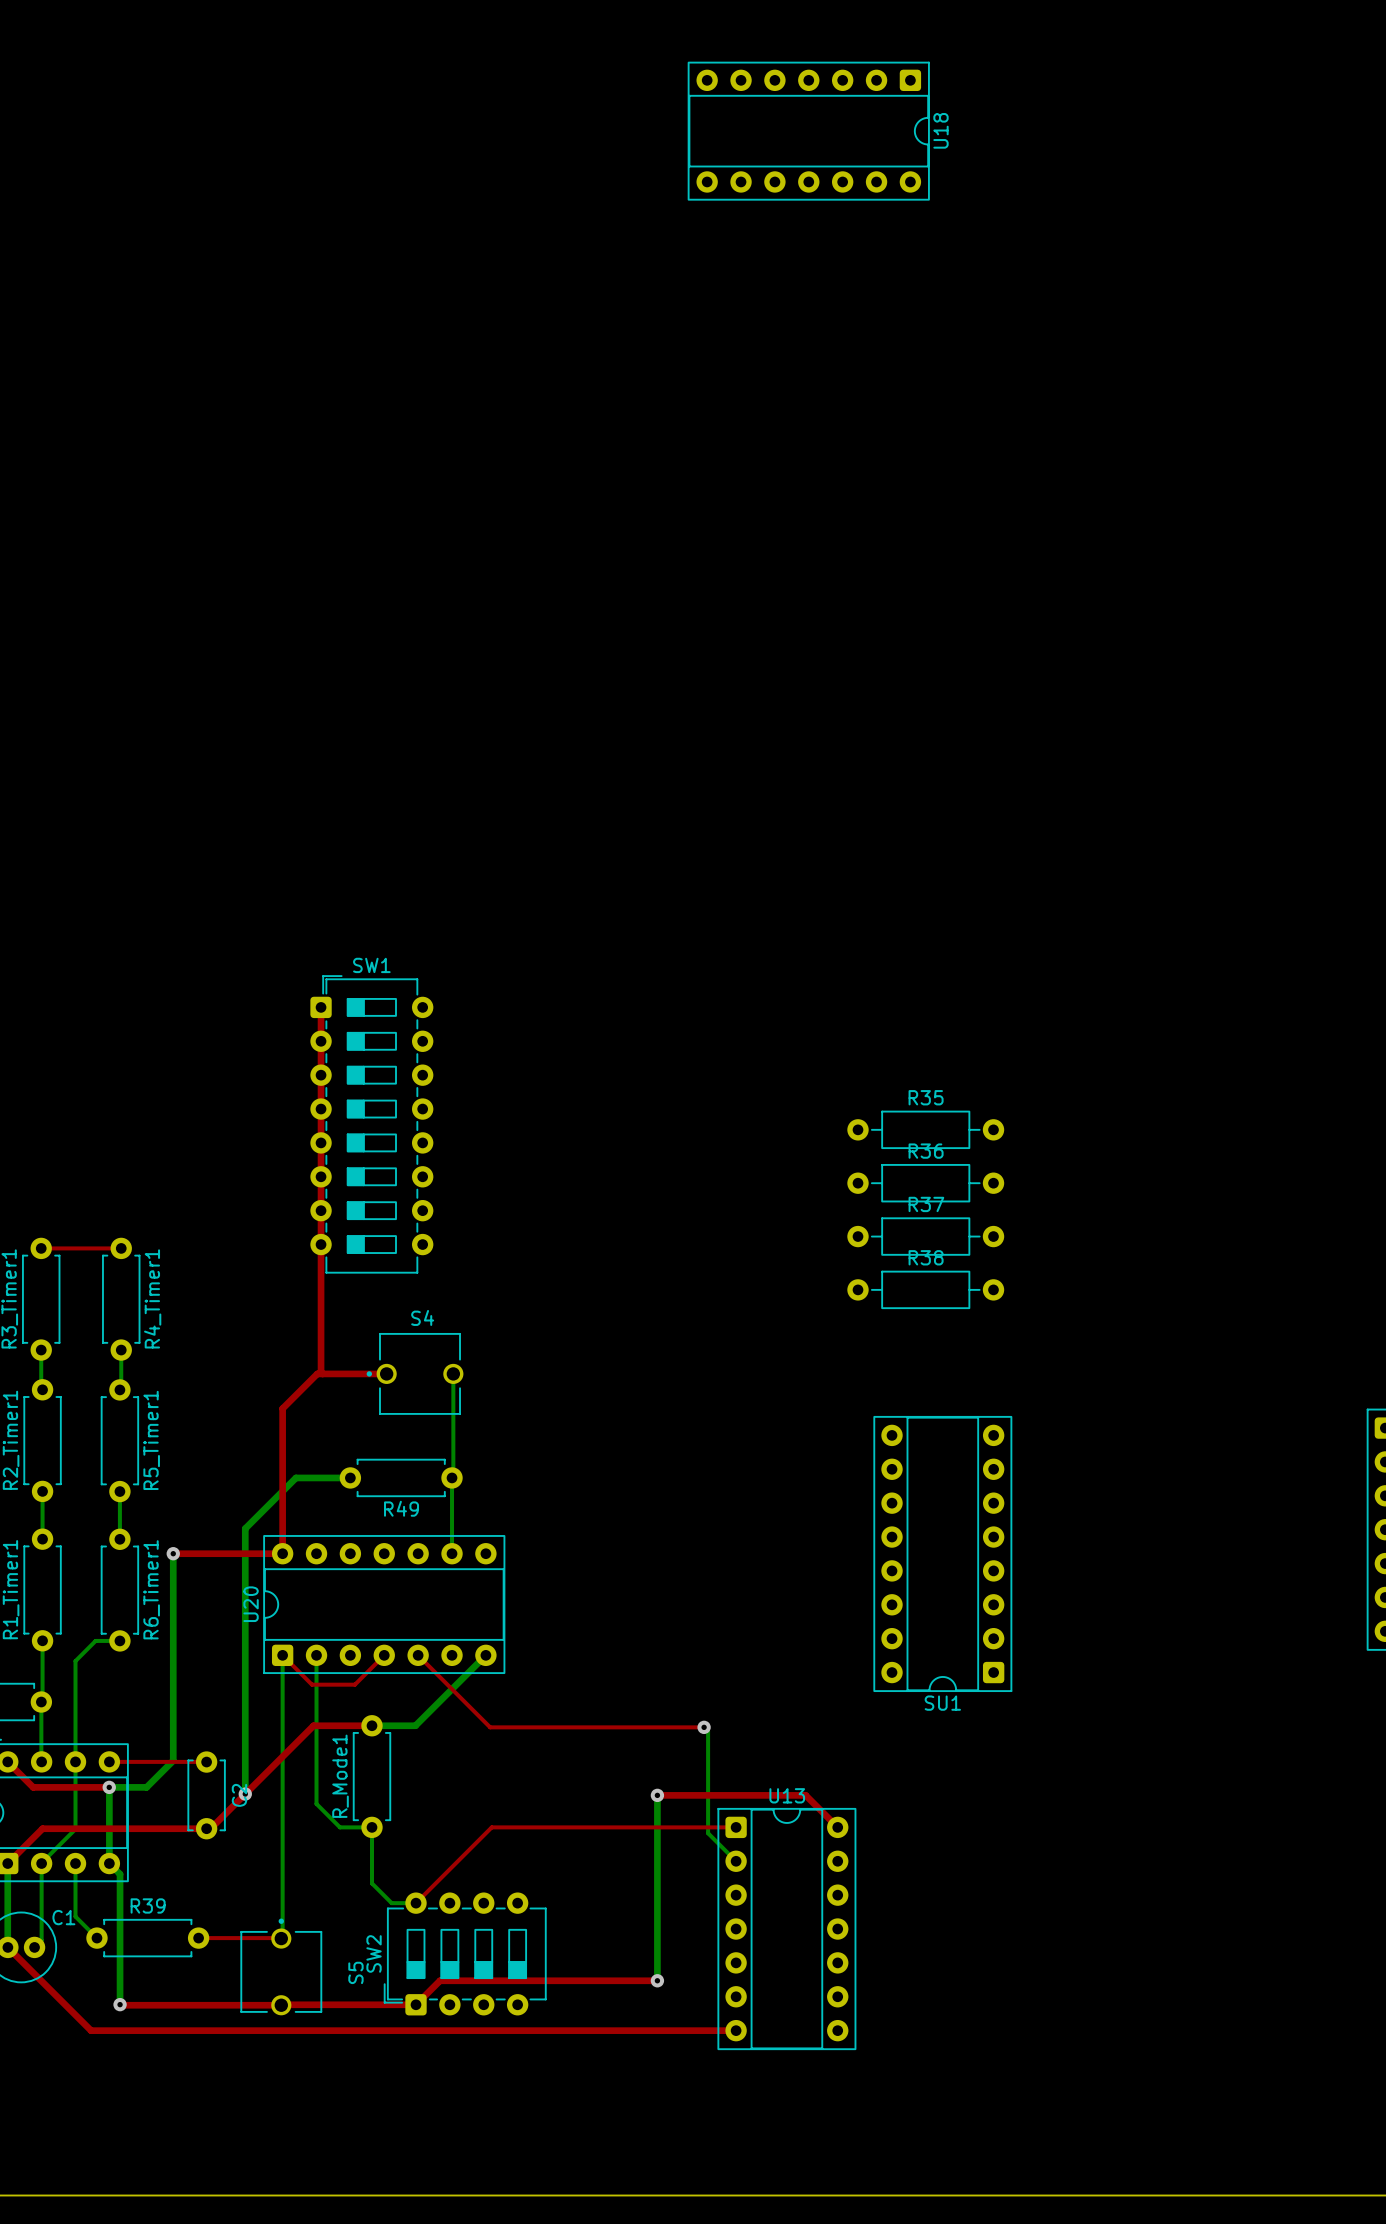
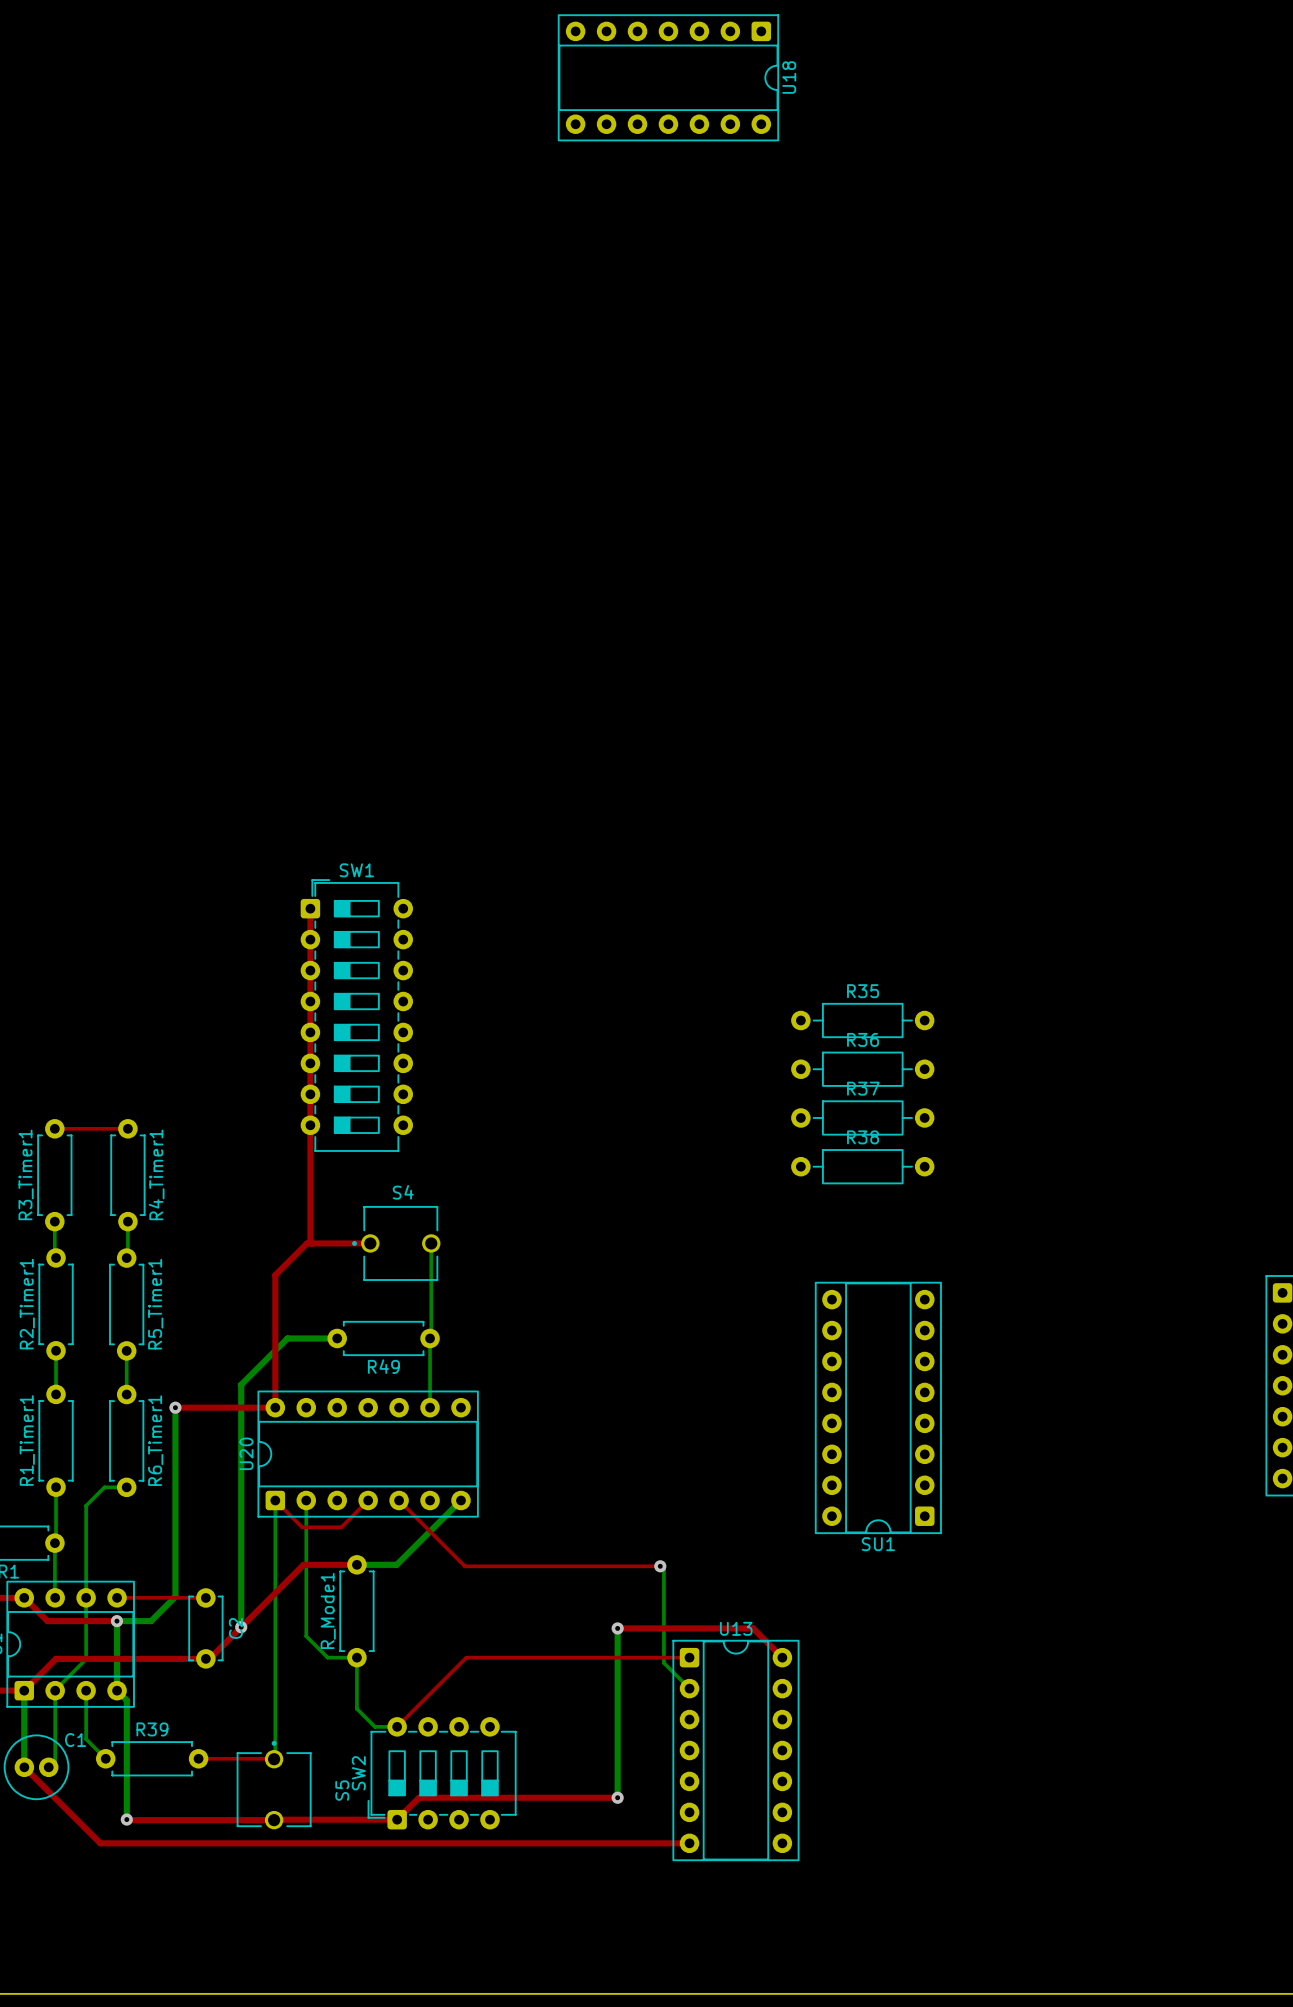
U18 position: (808, 131) -> (668, 77)

